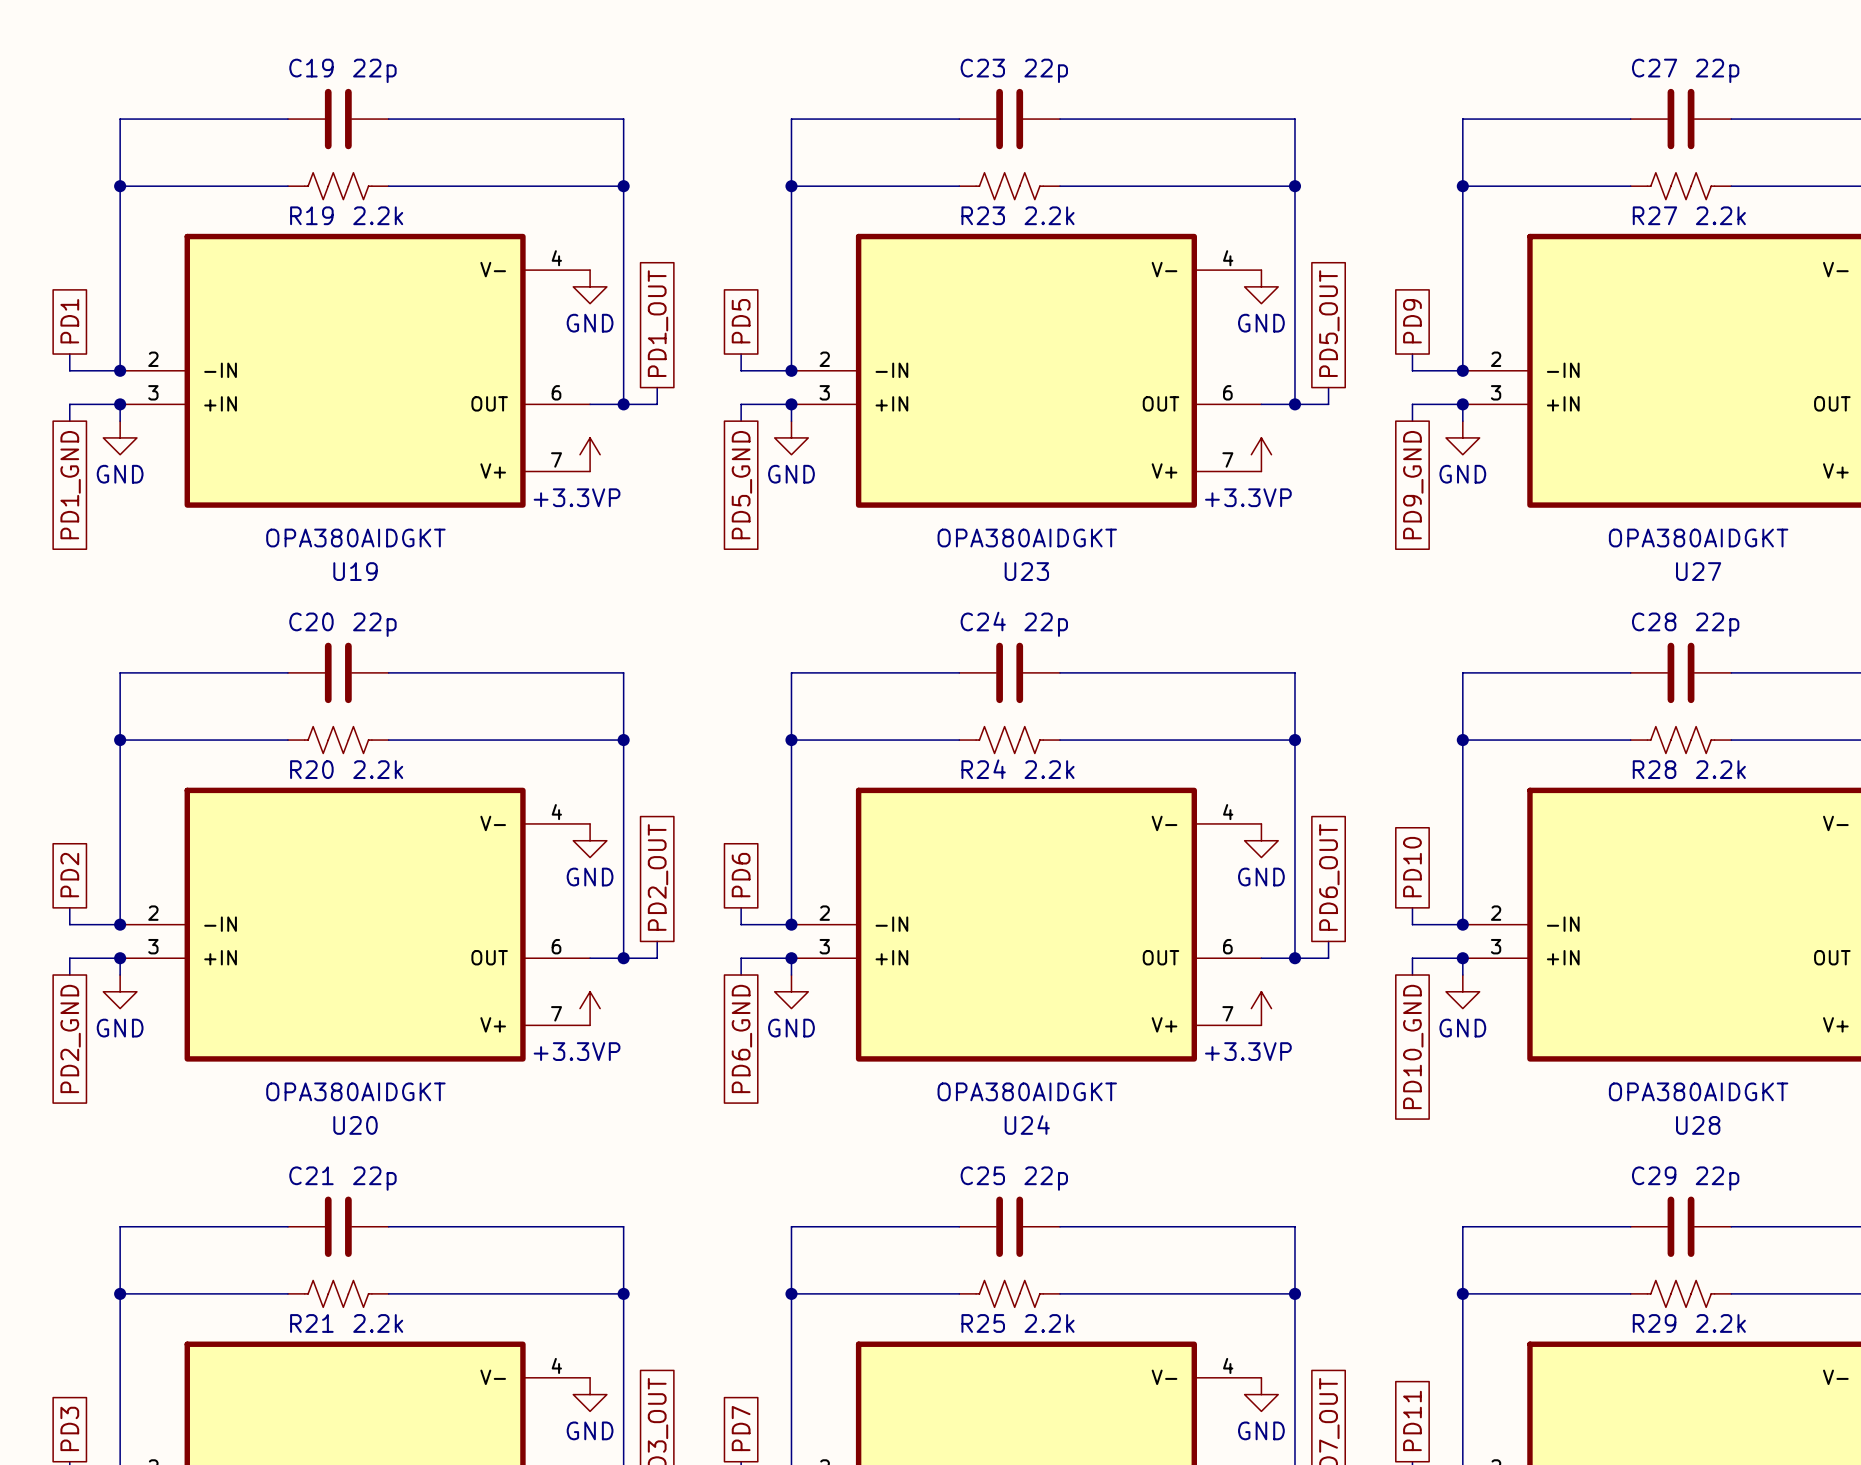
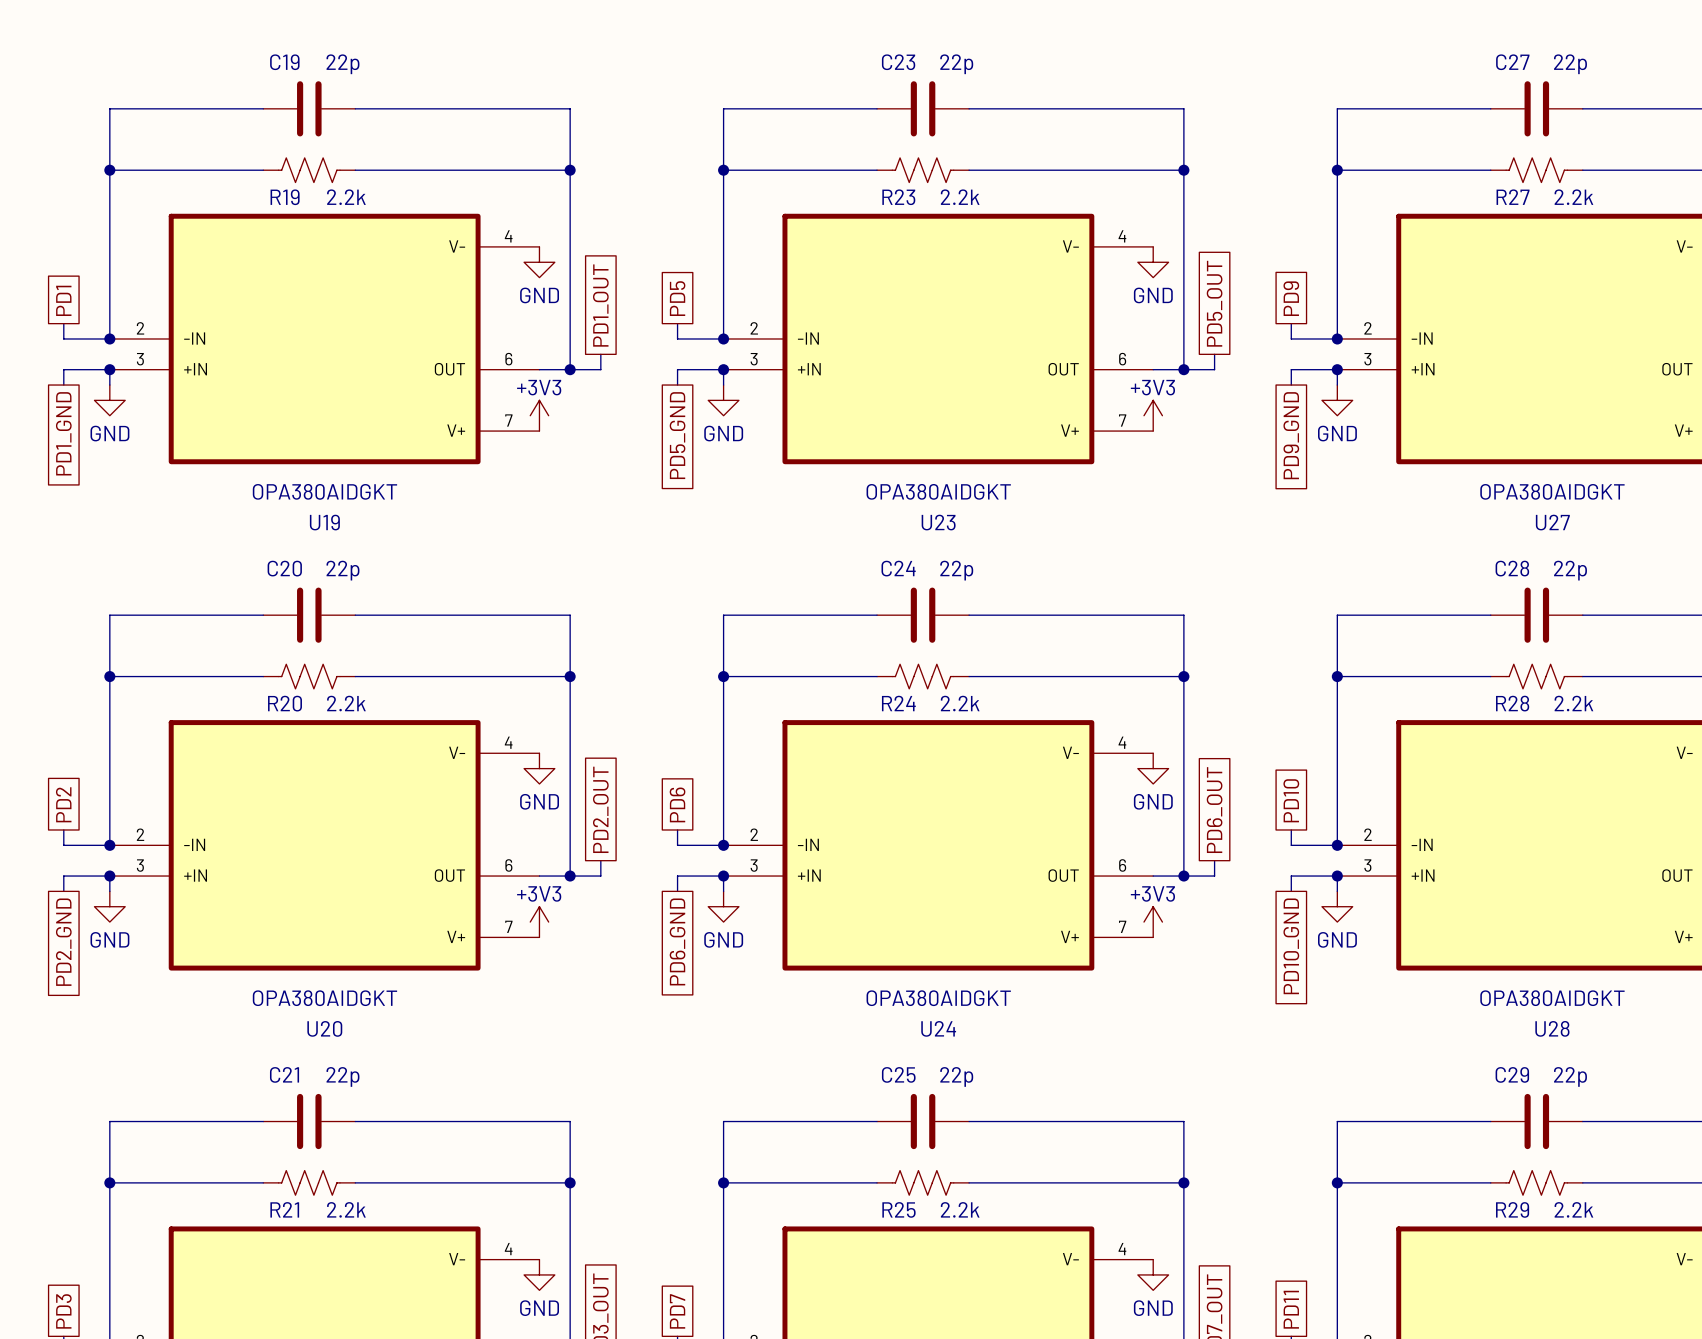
power symbol: +3.3VP (590, 454) -> +3V3 (539, 415)
power symbol: +3.3VP (1261, 454) -> +3V3 (1153, 415)
power symbol: +3.3VP (590, 1008) -> +3V3 (539, 922)
power symbol: +3.3VP (1261, 1008) -> +3V3 (1153, 922)

